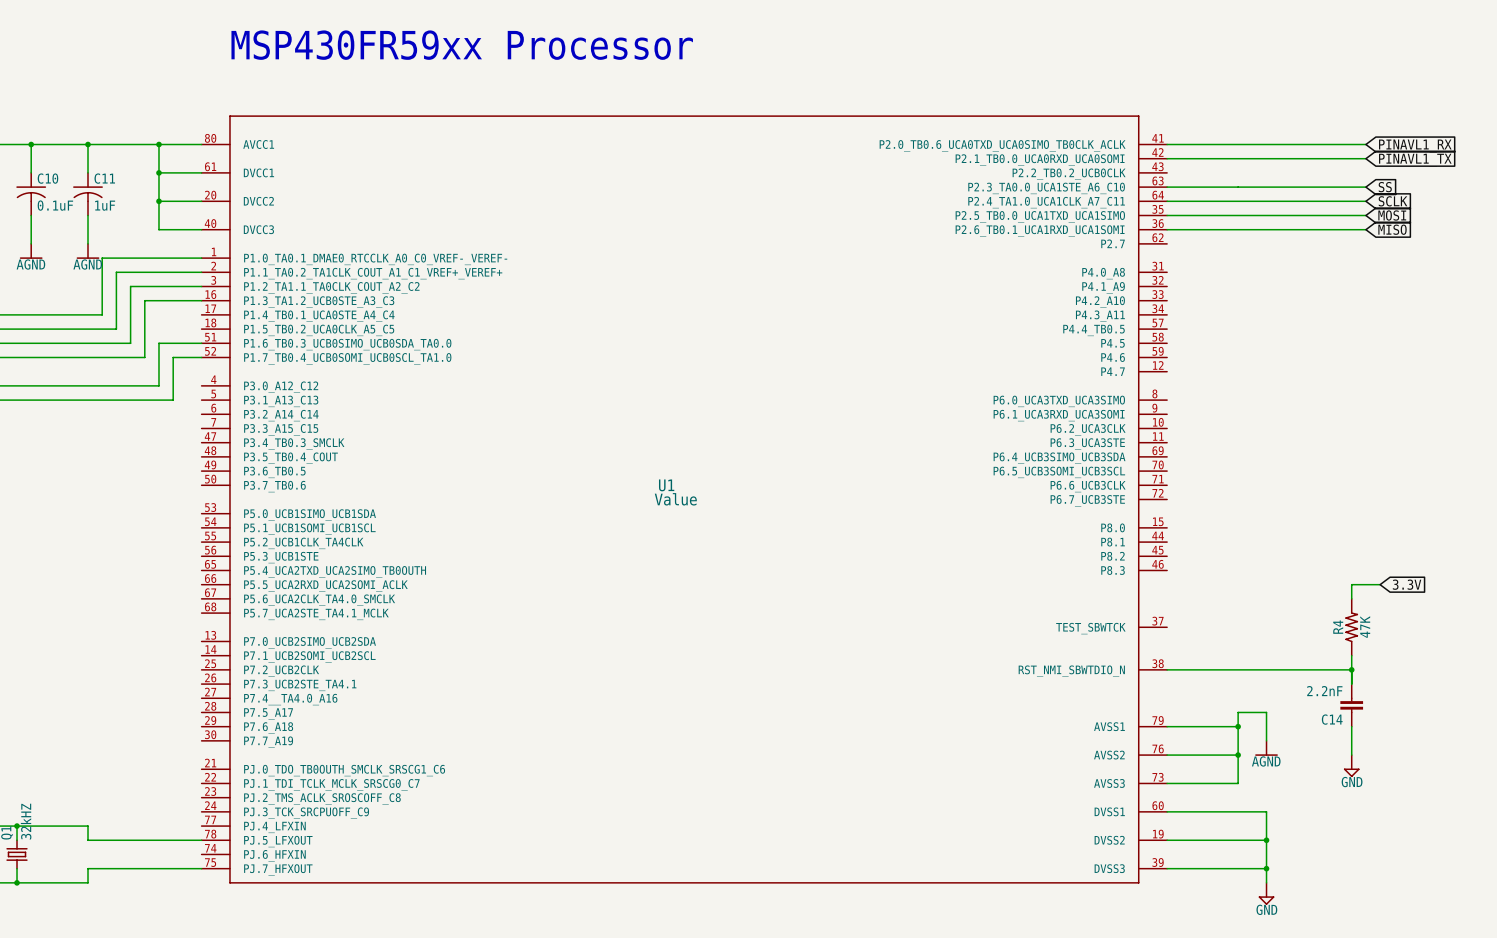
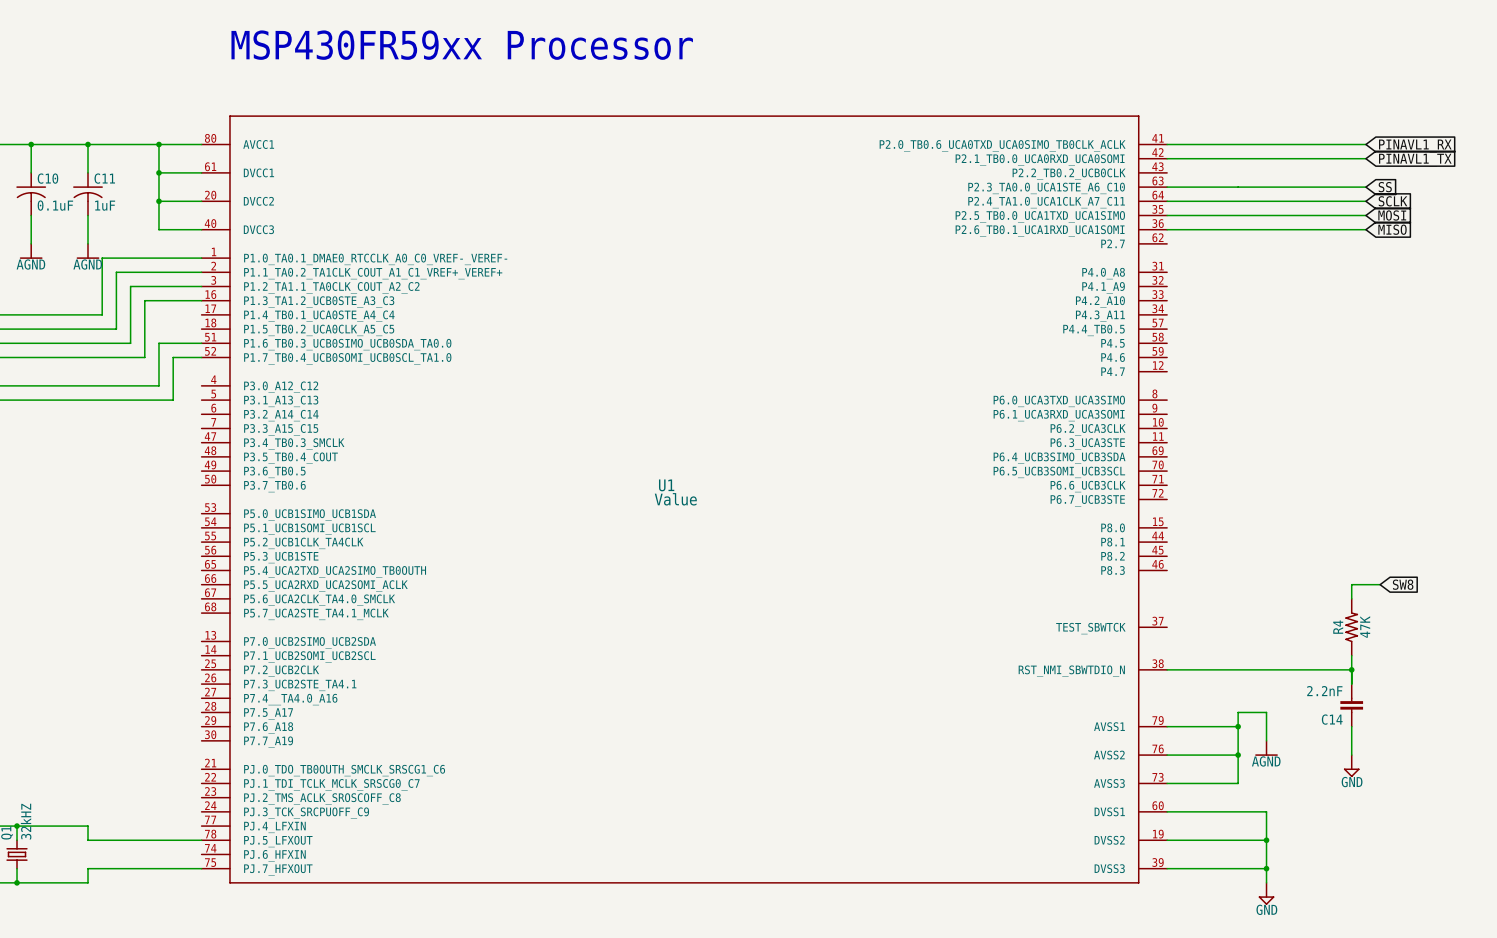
global label: 3.3V (1407, 584) -> SW8 (1403, 584)

